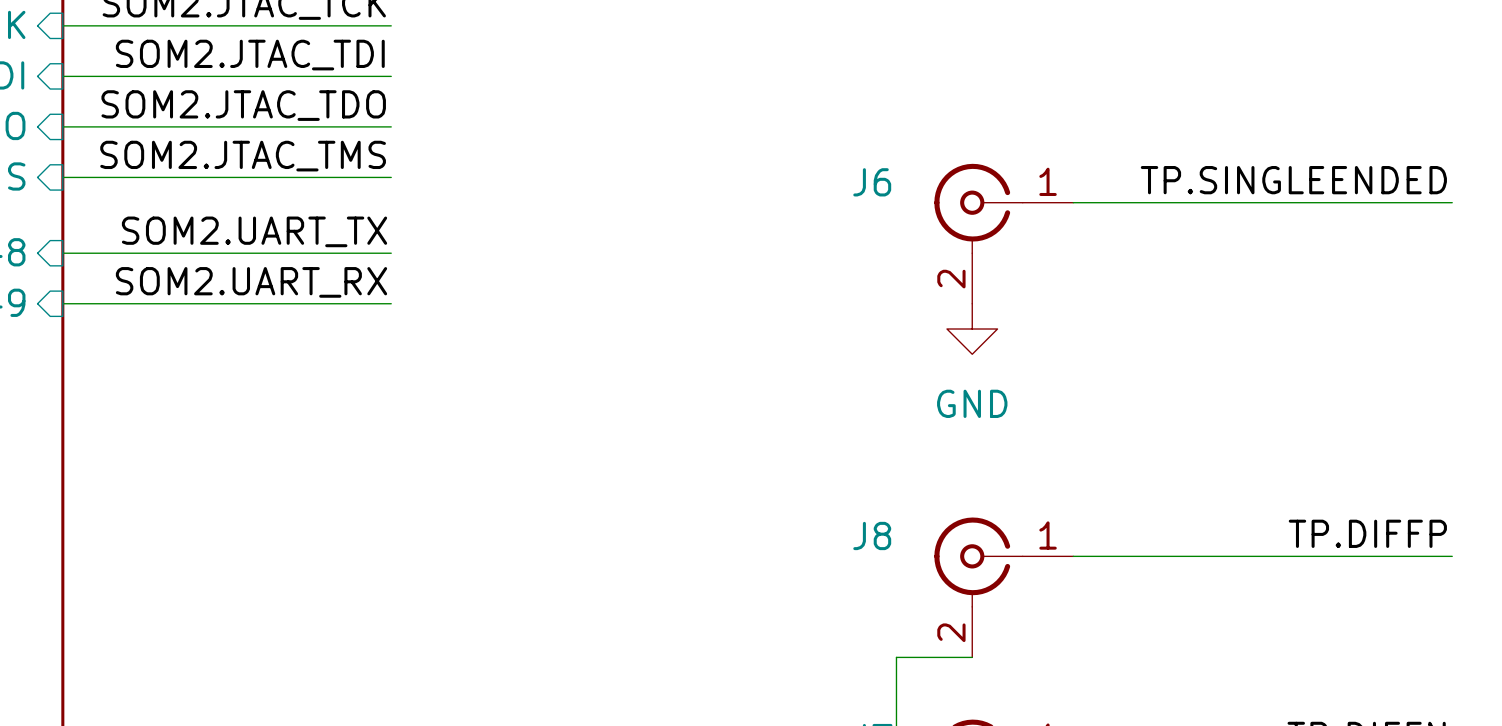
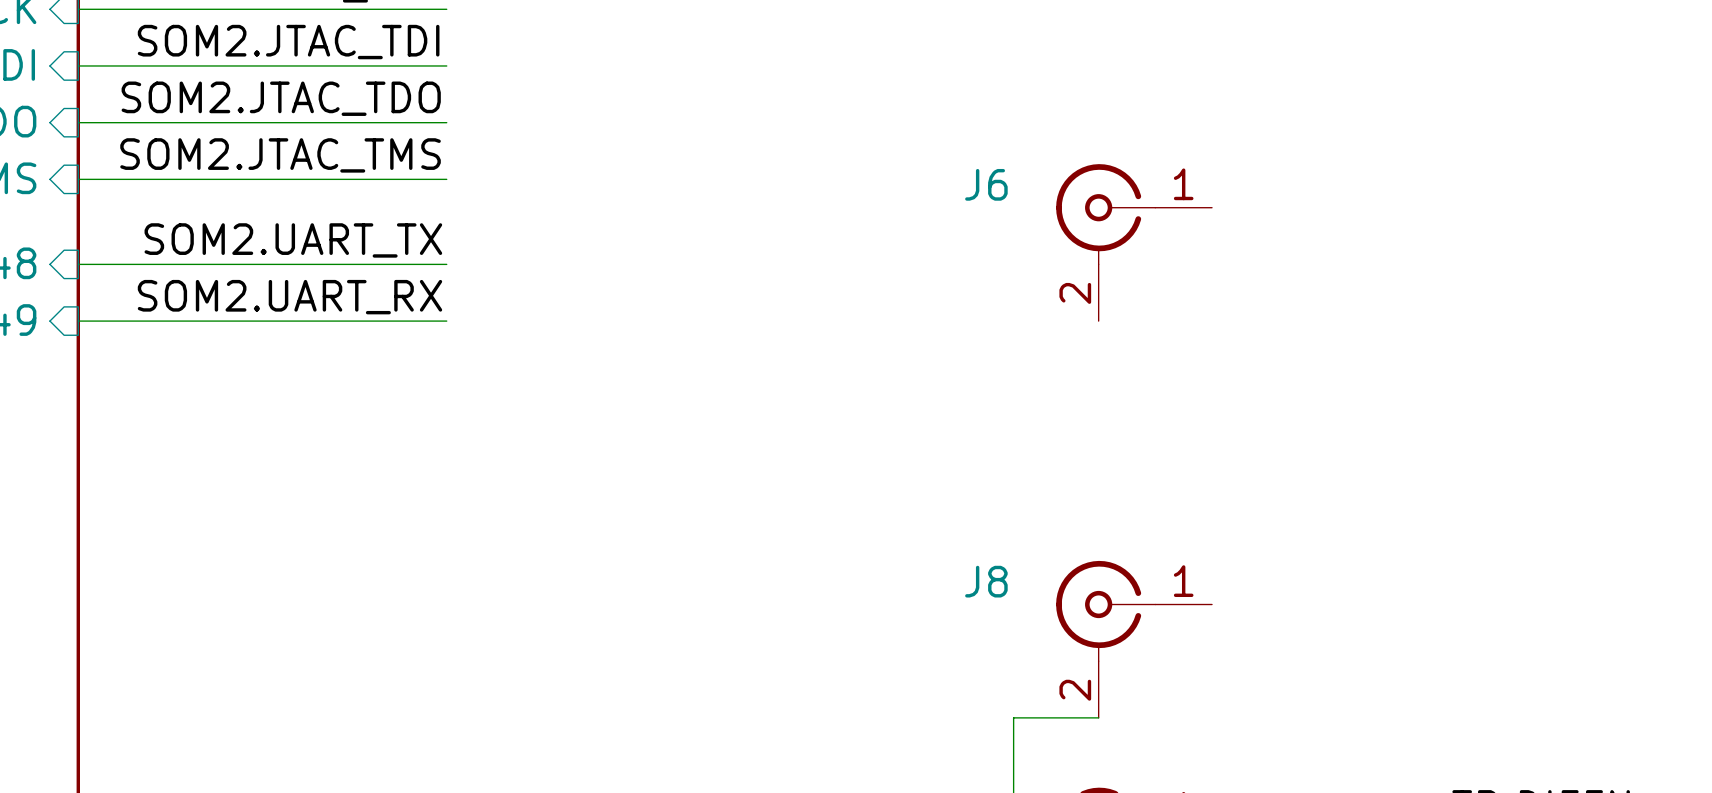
label: TP.SINGLEENDED (1293, 180) -> none
wire: (1073, 202) (1452, 202) -> none
power symbol: GND (972, 329) -> none
label: TP.DIFFP (1367, 533) -> none
wire: (1073, 556) (1452, 556) -> none

